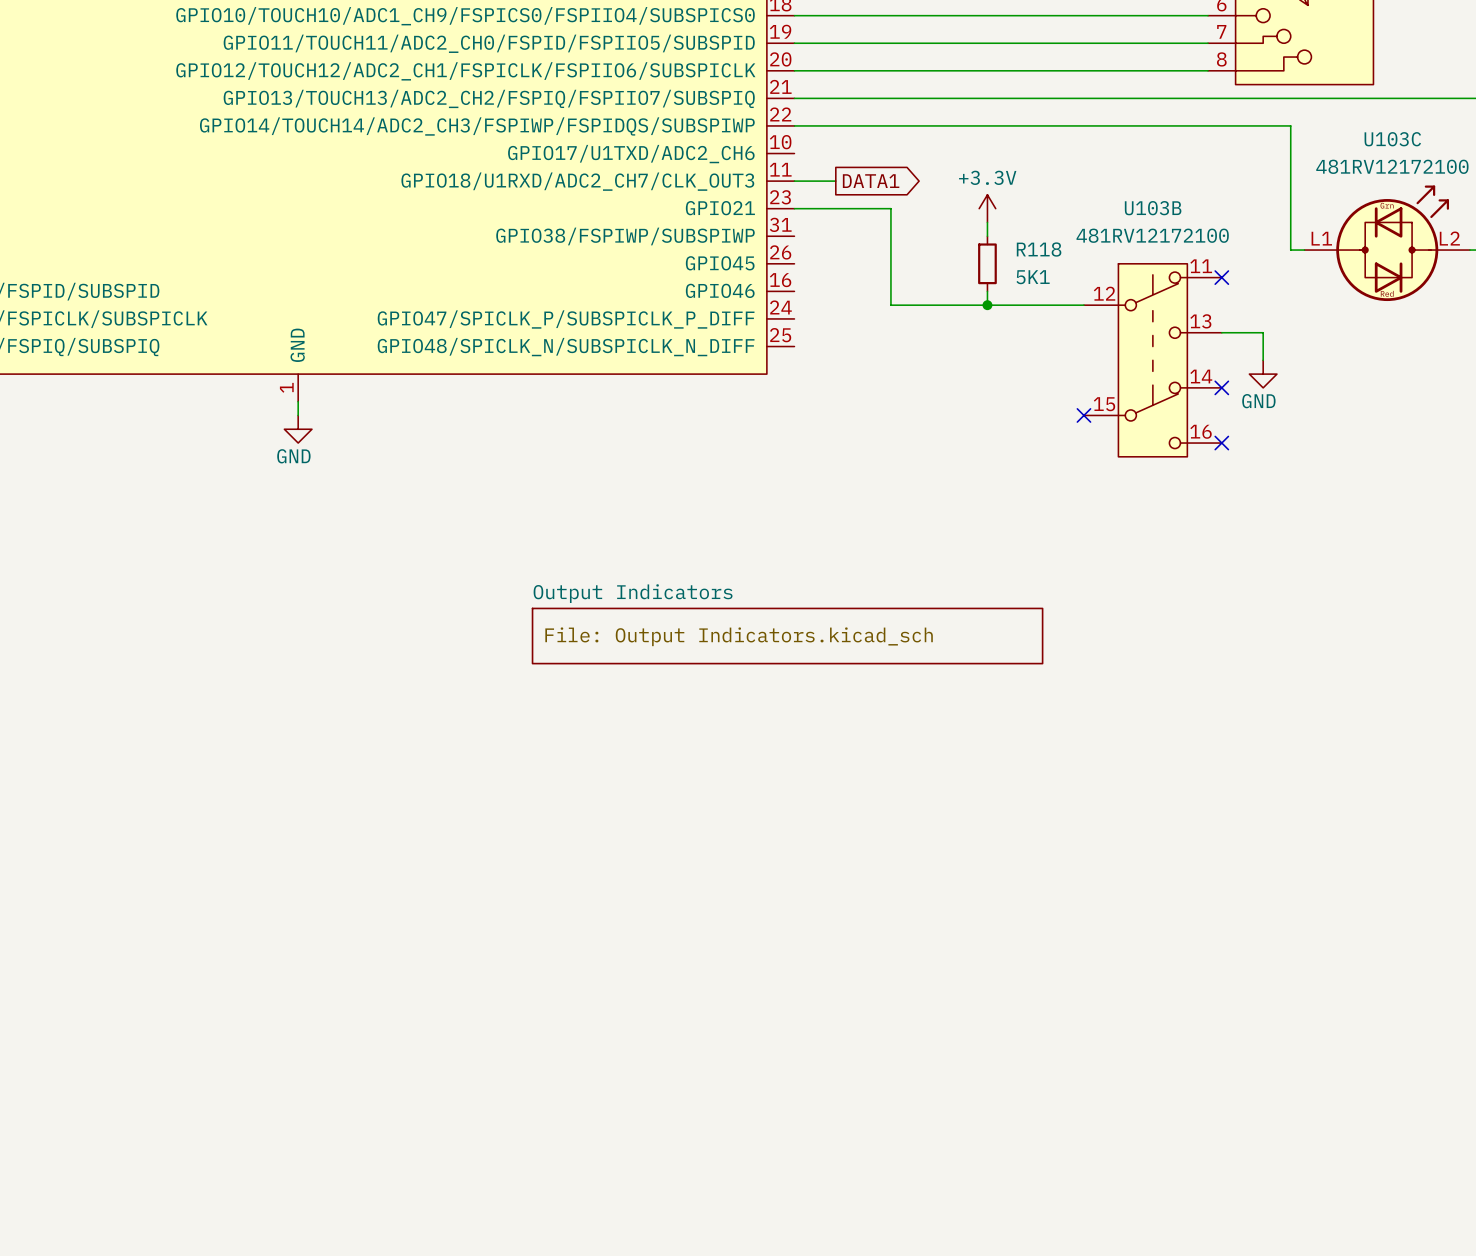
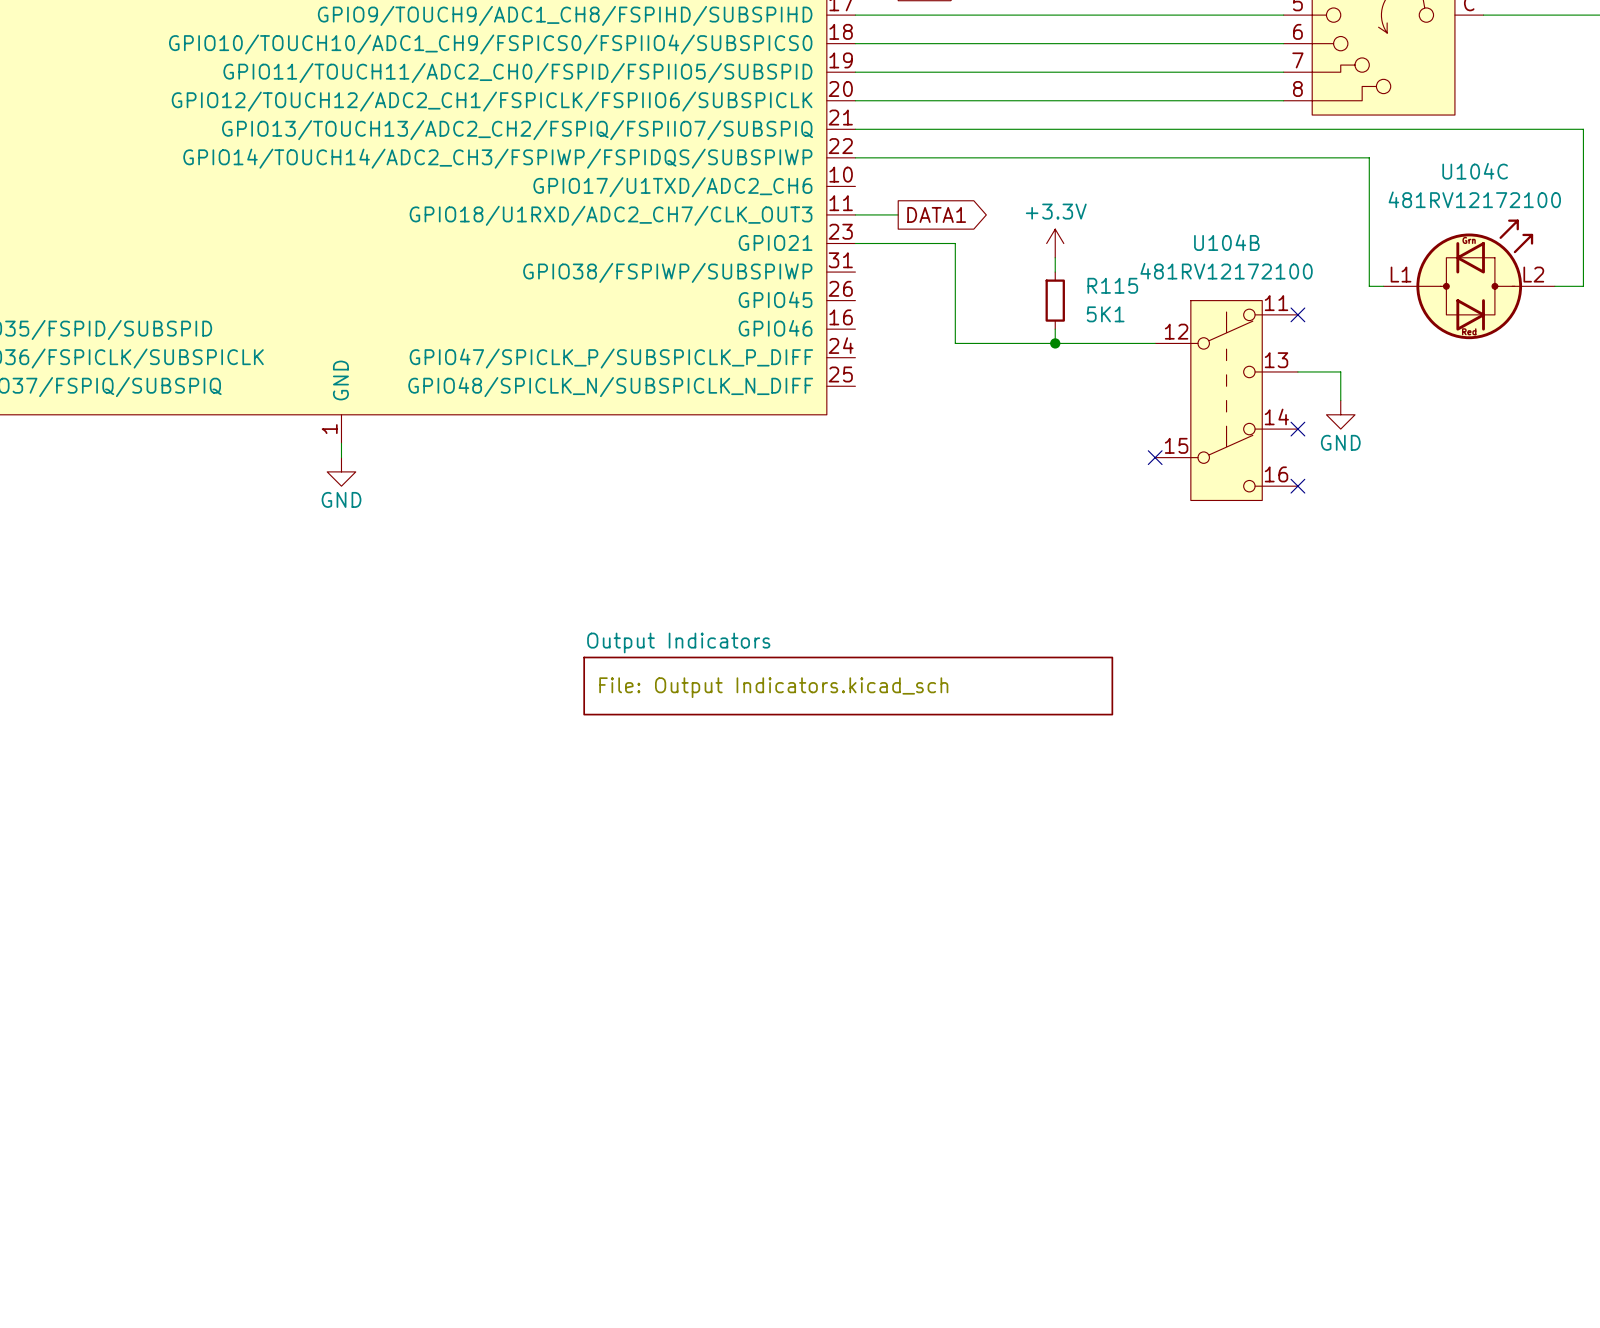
U103C name: U103C (1392, 139) -> U104C (1475, 171)
U103B name: U103B (1153, 208) -> U104B (1226, 242)
R118 name: R118 (1039, 249) -> R115 (1112, 285)

